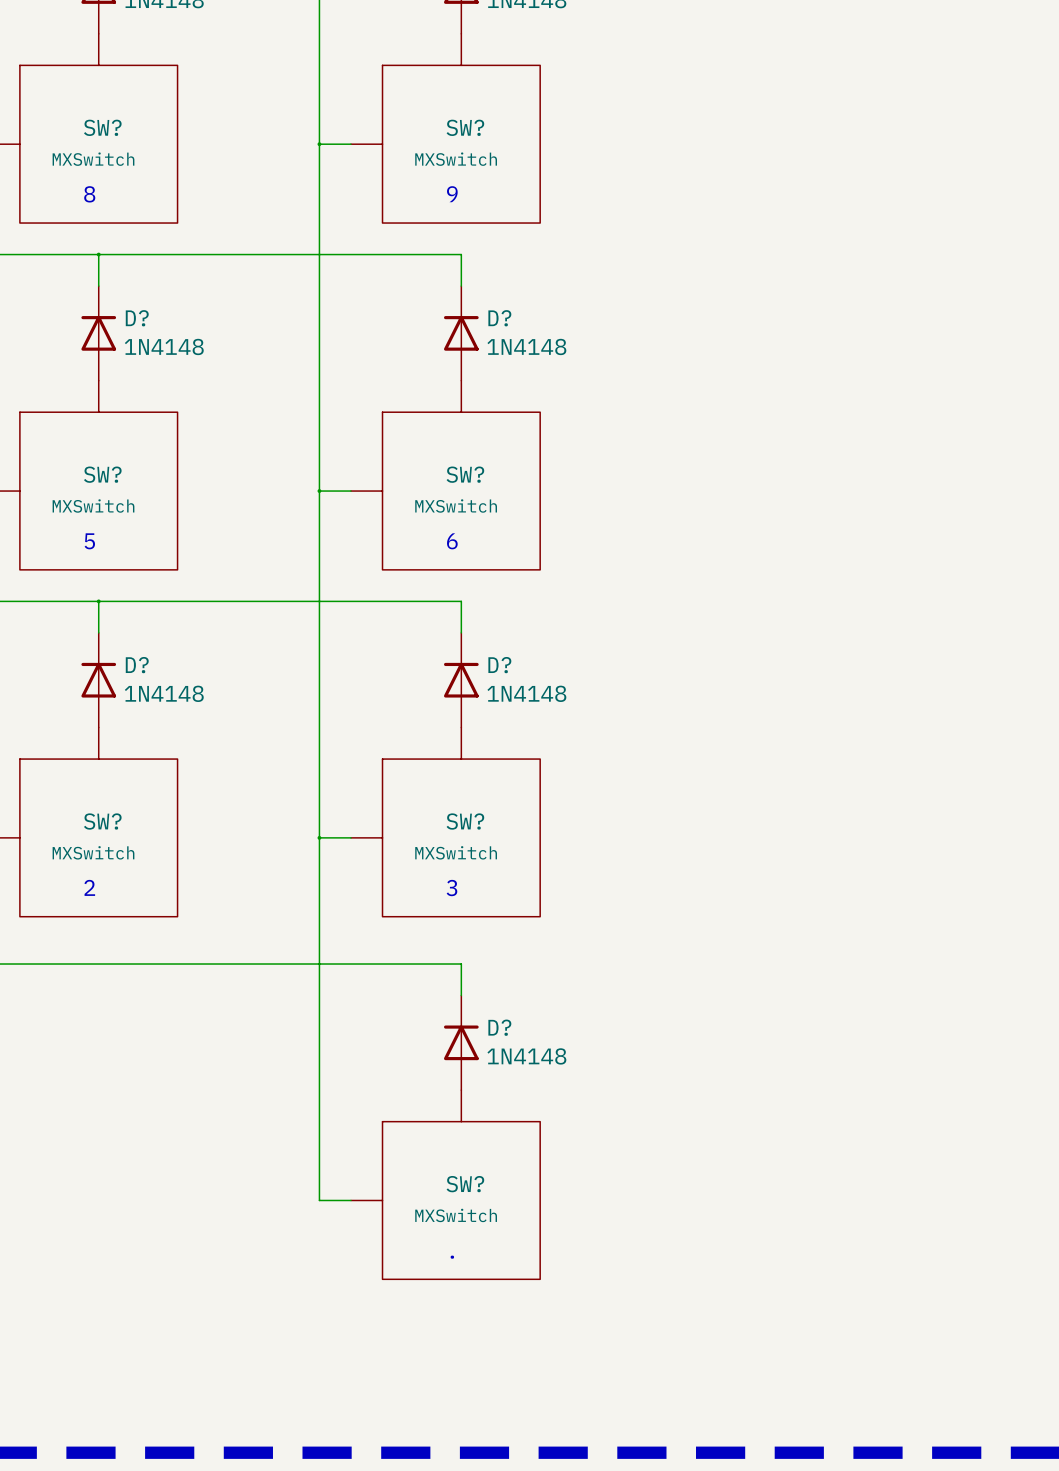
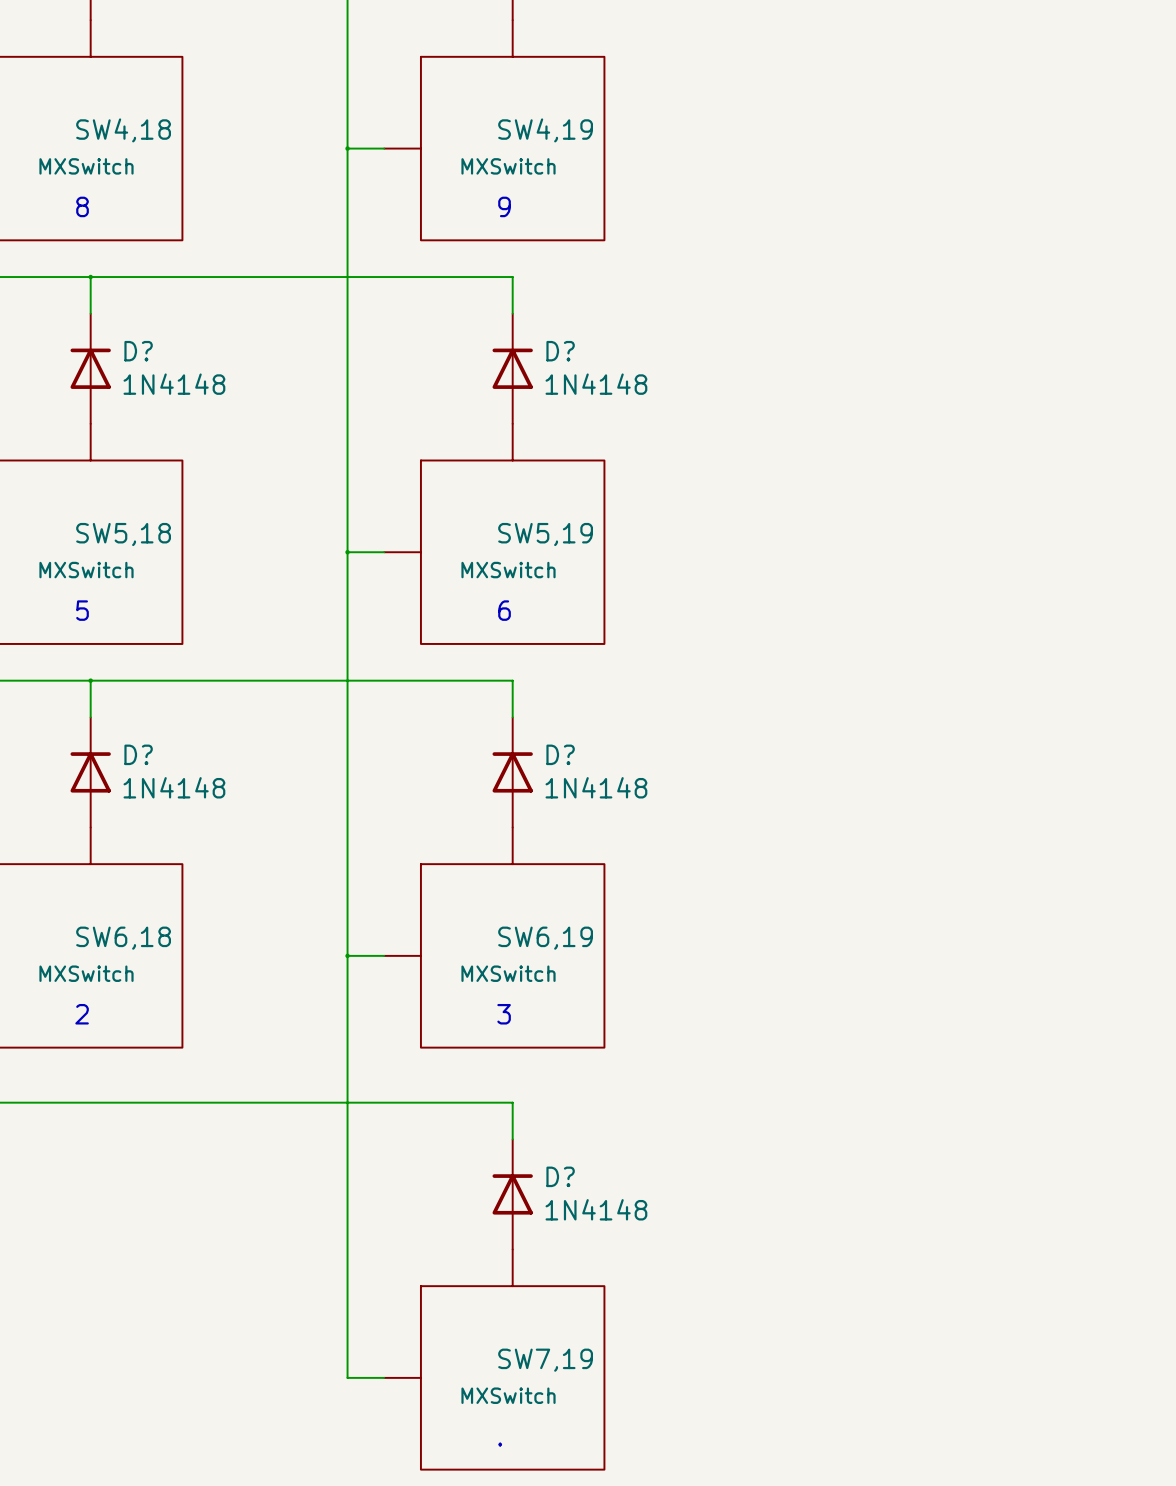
SW? name: SW? (102, 127) -> SW4,18 (123, 130)
SW? name: SW? (465, 127) -> SW4,19 (545, 130)
SW? name: SW? (102, 474) -> SW5,18 (123, 534)
SW? name: SW? (465, 474) -> SW5,19 (545, 534)
SW? name: SW? (102, 821) -> SW6,18 (123, 938)
SW? name: SW? (465, 821) -> SW6,19 (545, 938)
SW? name: SW? (465, 1184) -> SW7,19 (545, 1360)

